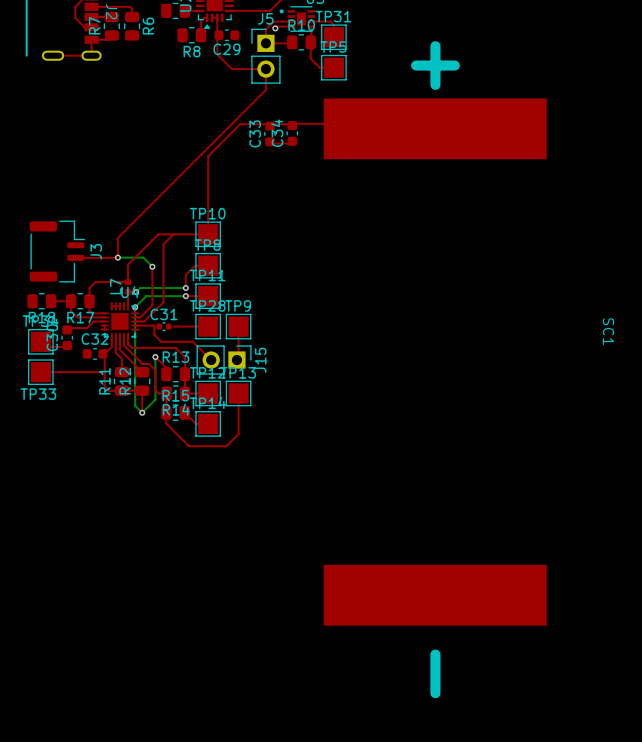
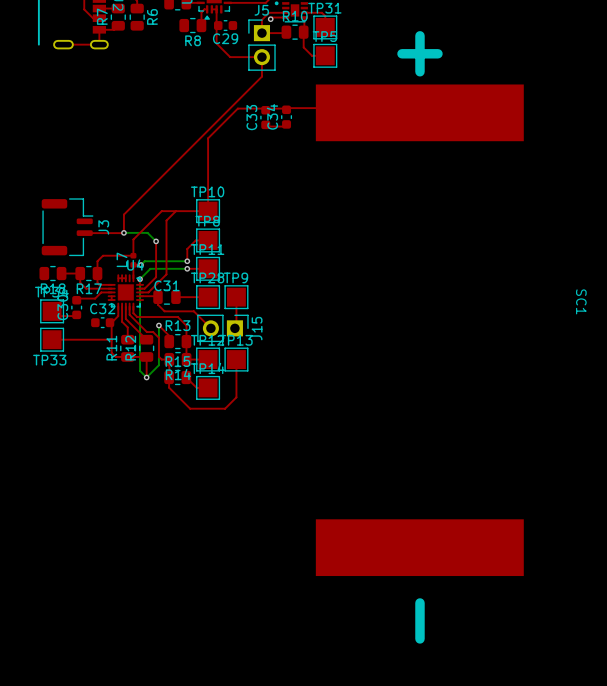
C31 footprint: [156, 322, 172, 331] -> [153, 289, 181, 305]

